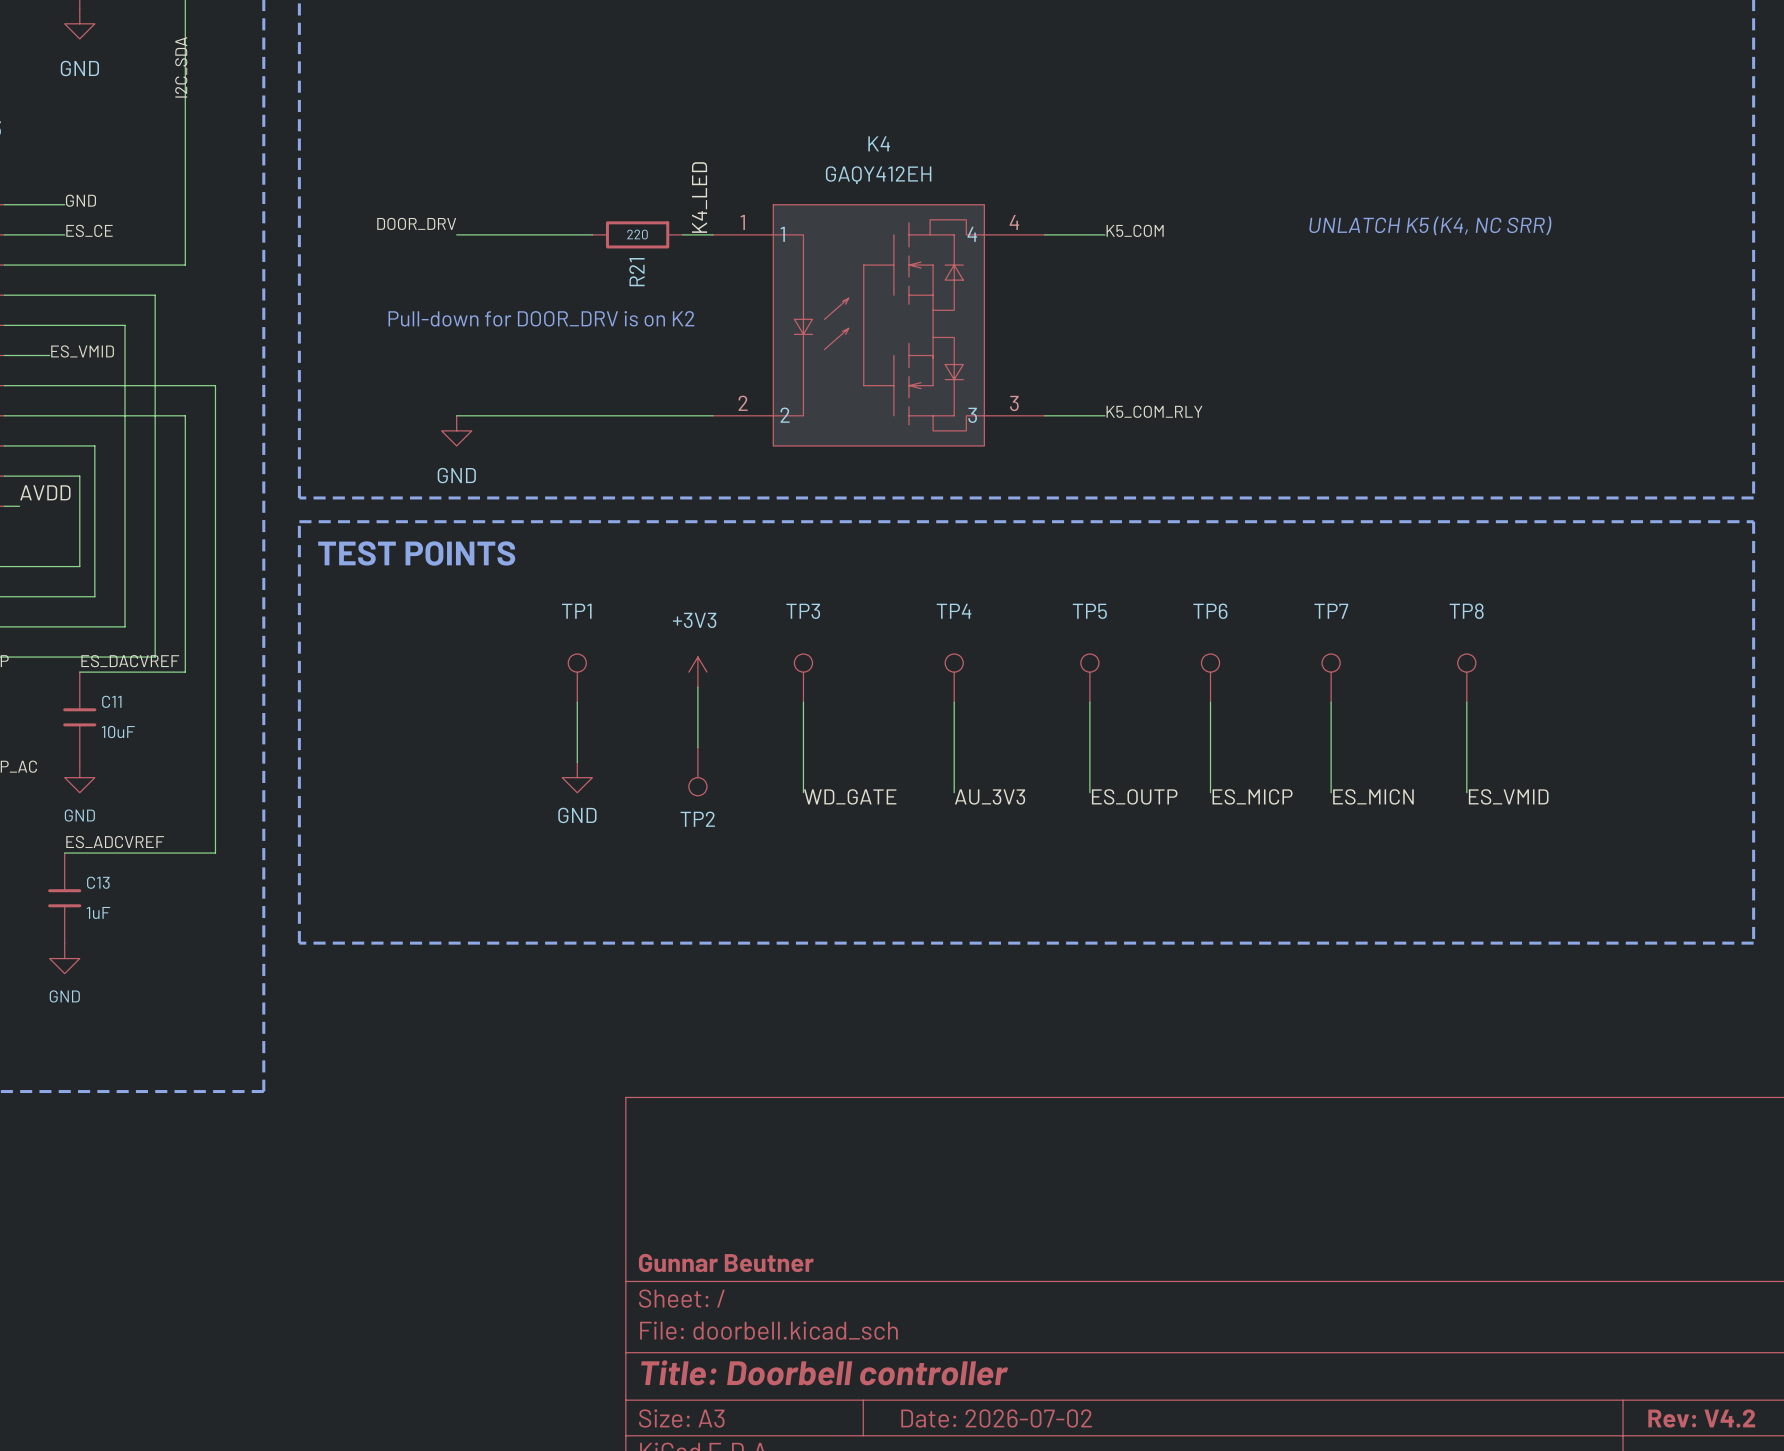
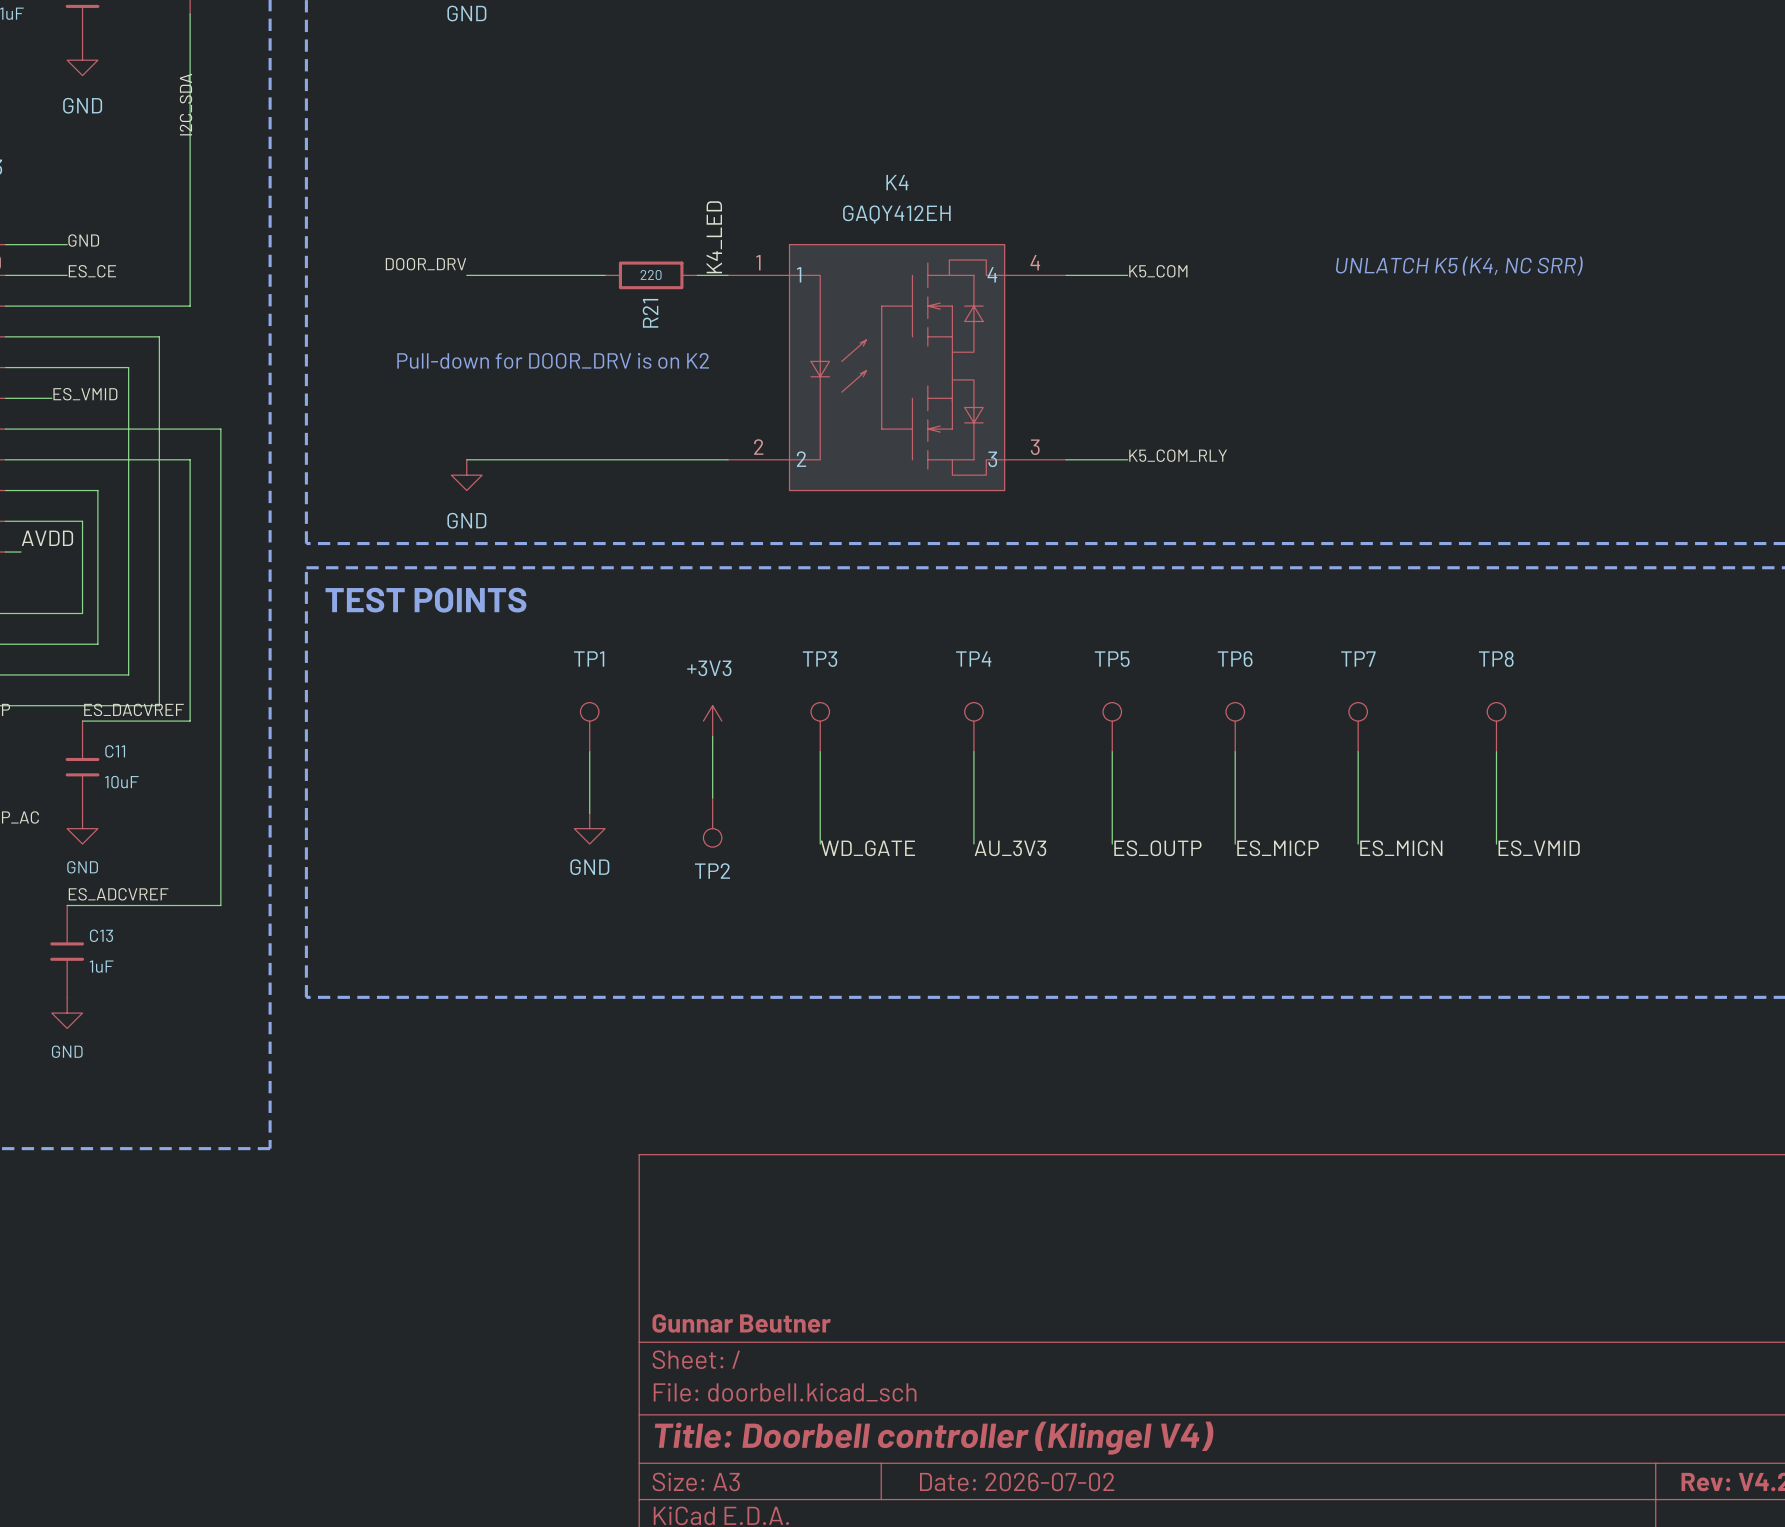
title block: Title: Doorbell controller (824, 1372) -> Title: Doorbell controller (Klingel V4) (934, 1438)

